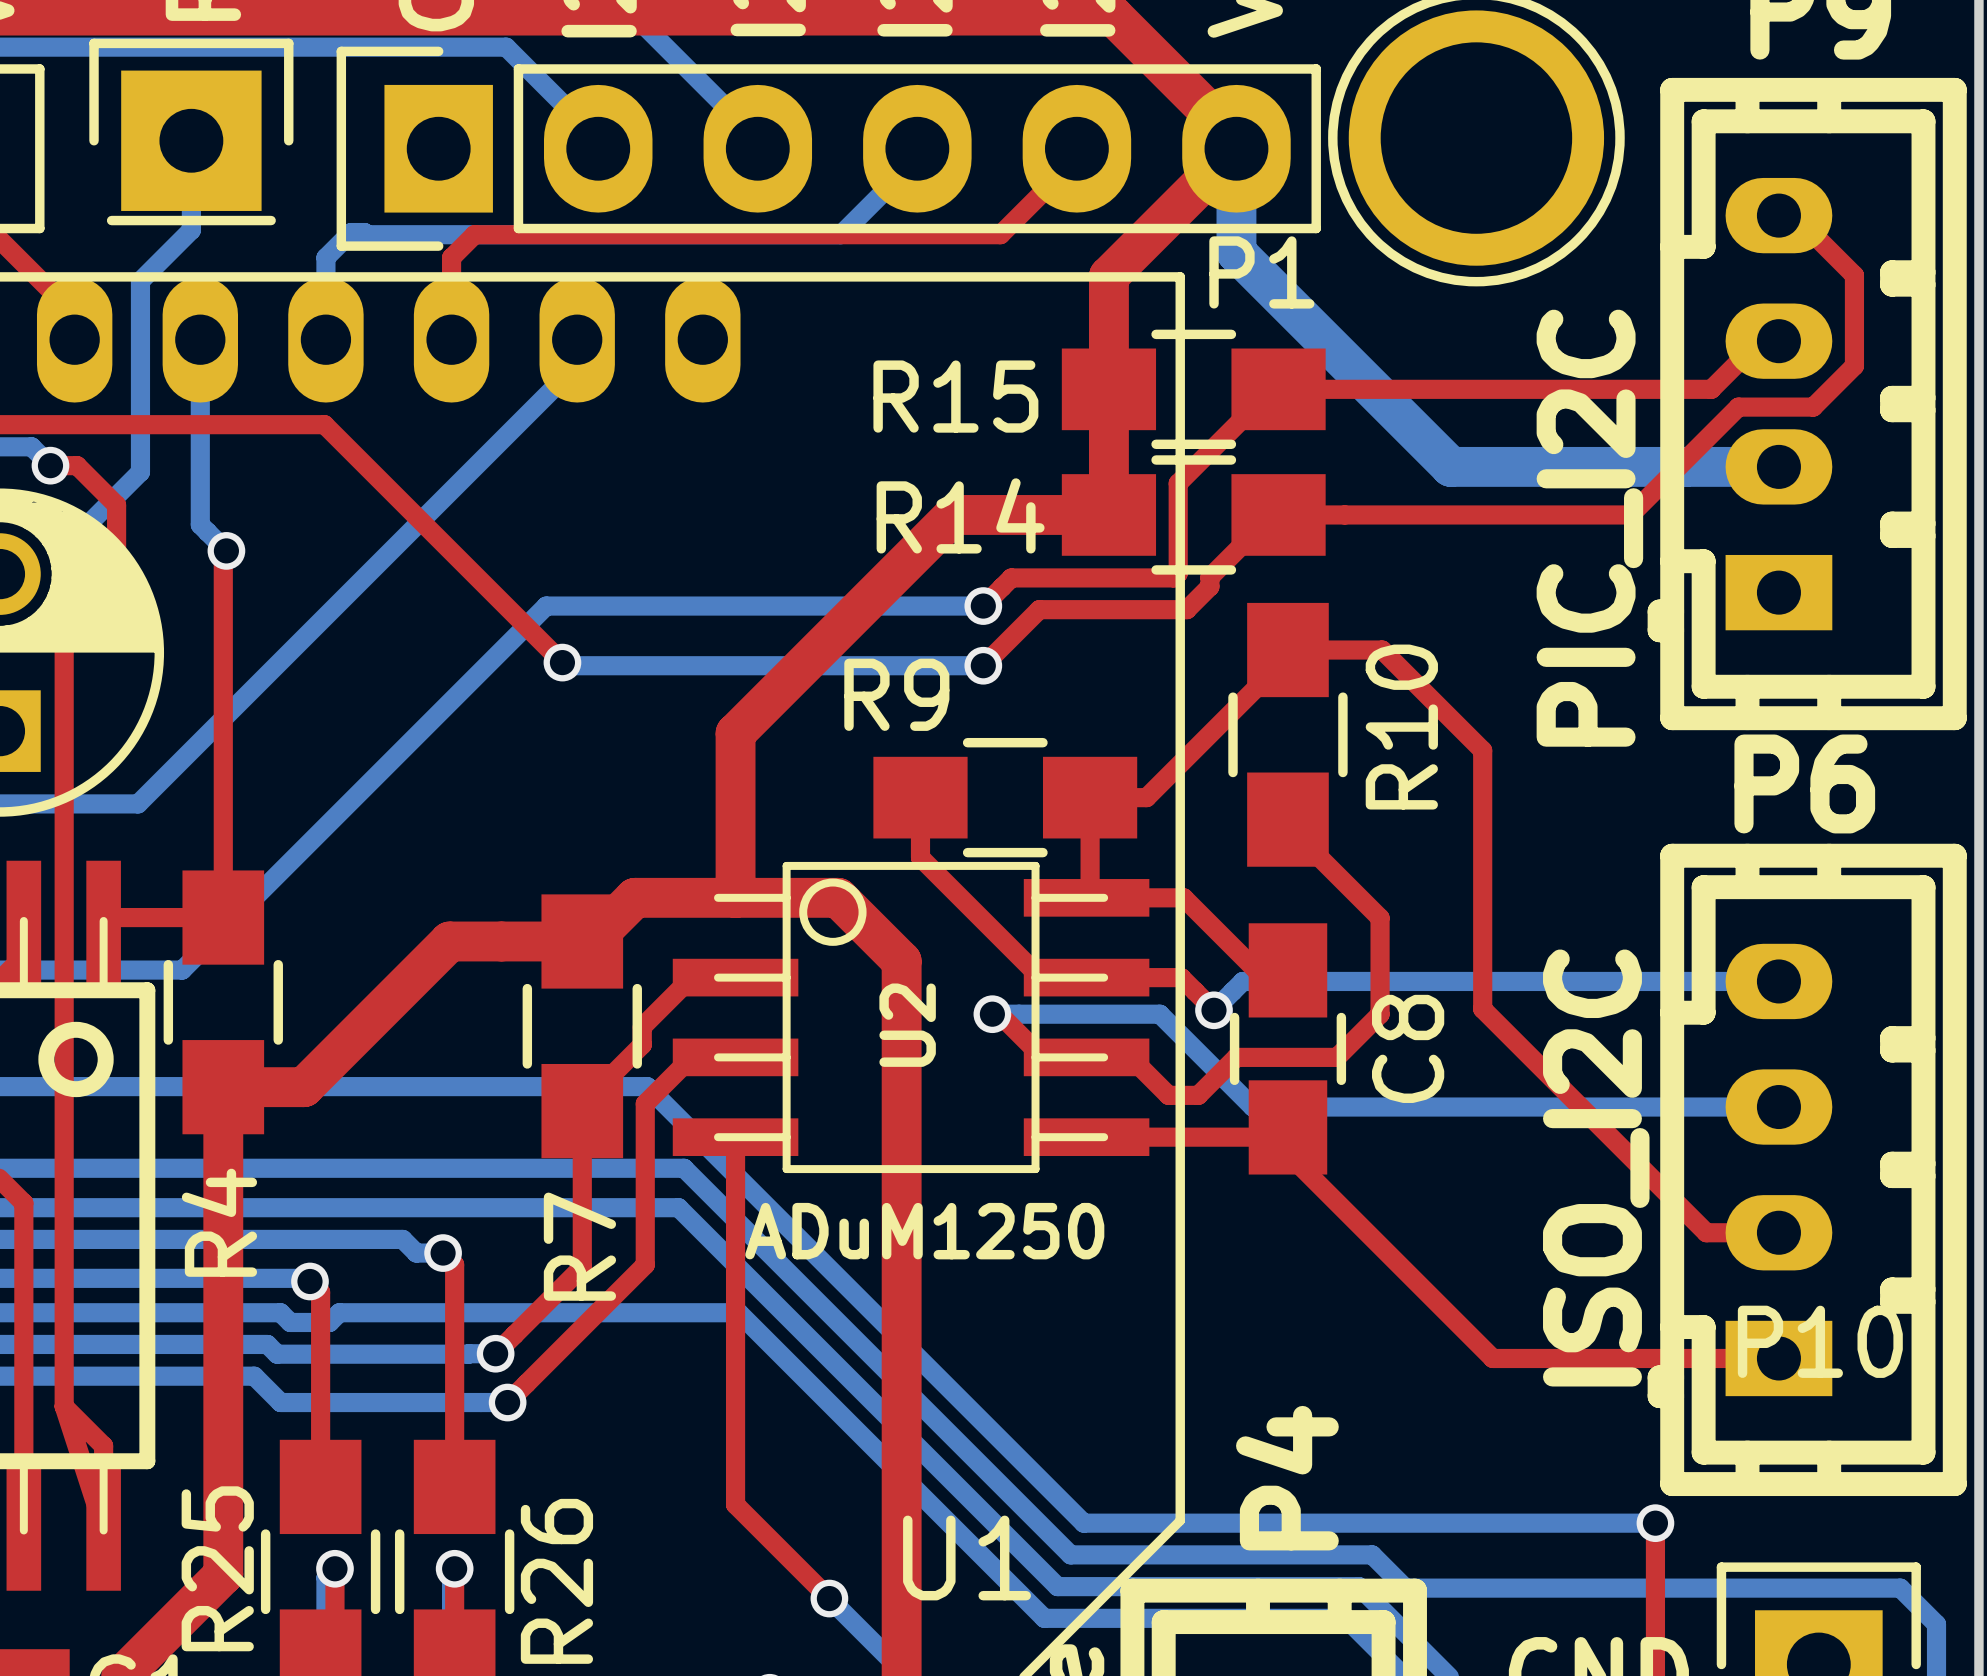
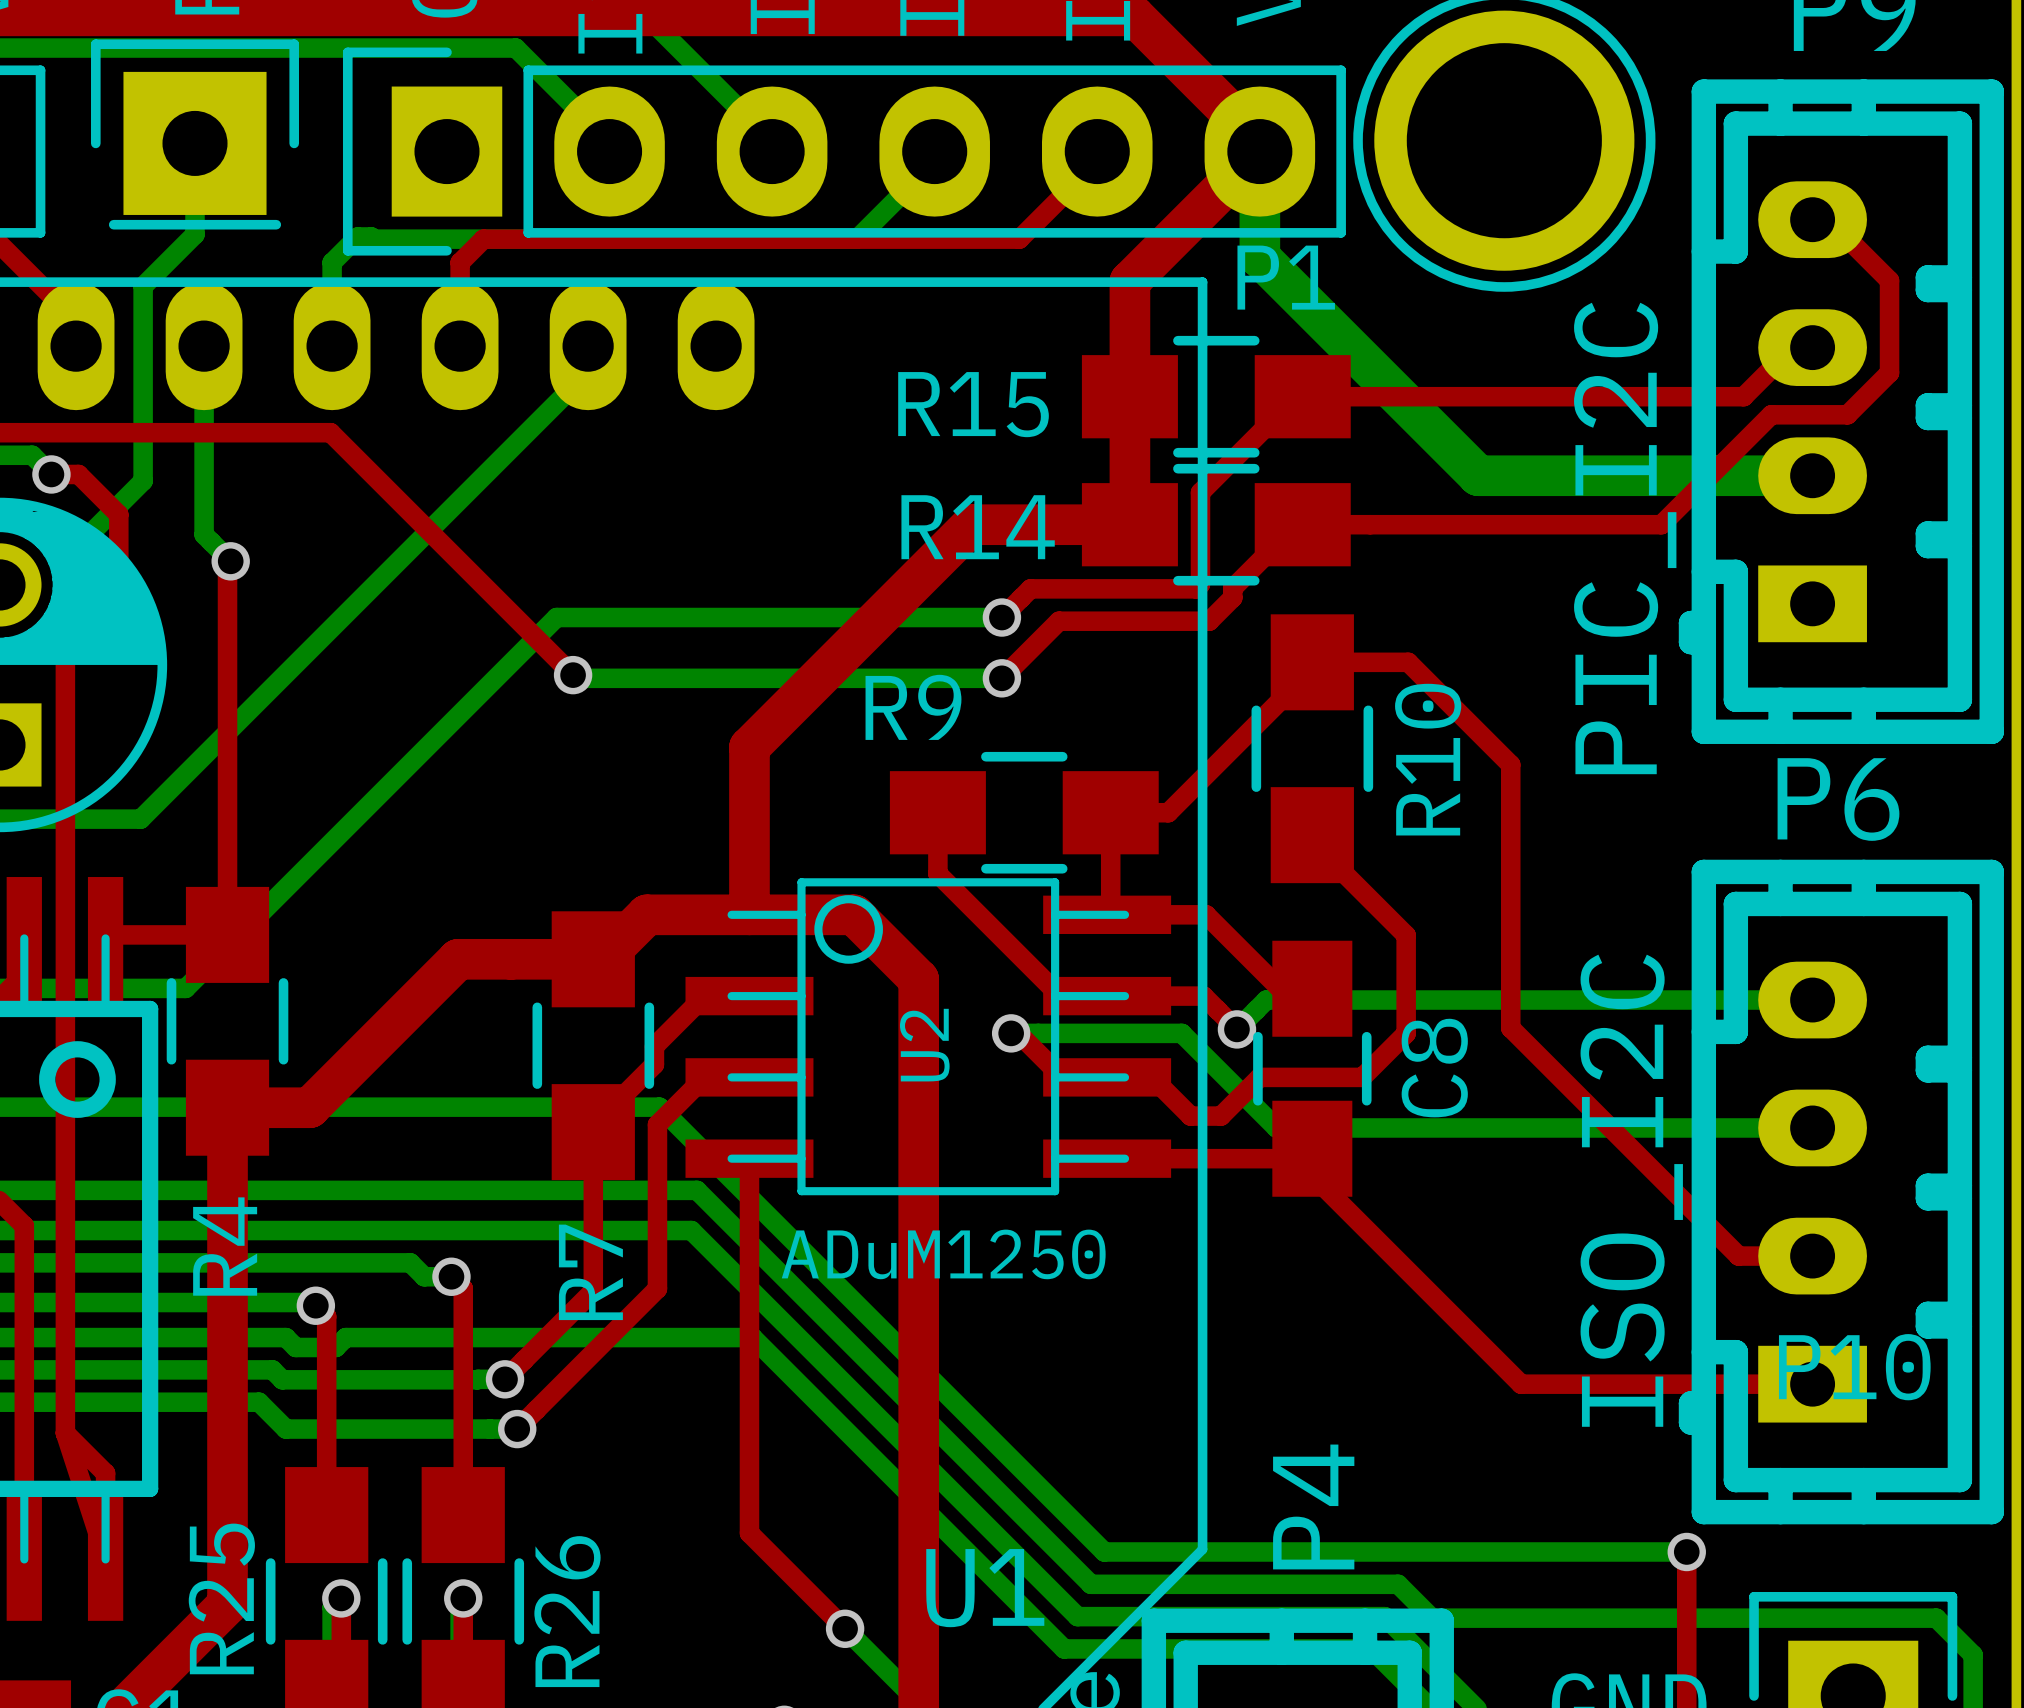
R10 name position: R10 (1401, 727) -> R10 (1428, 759)

